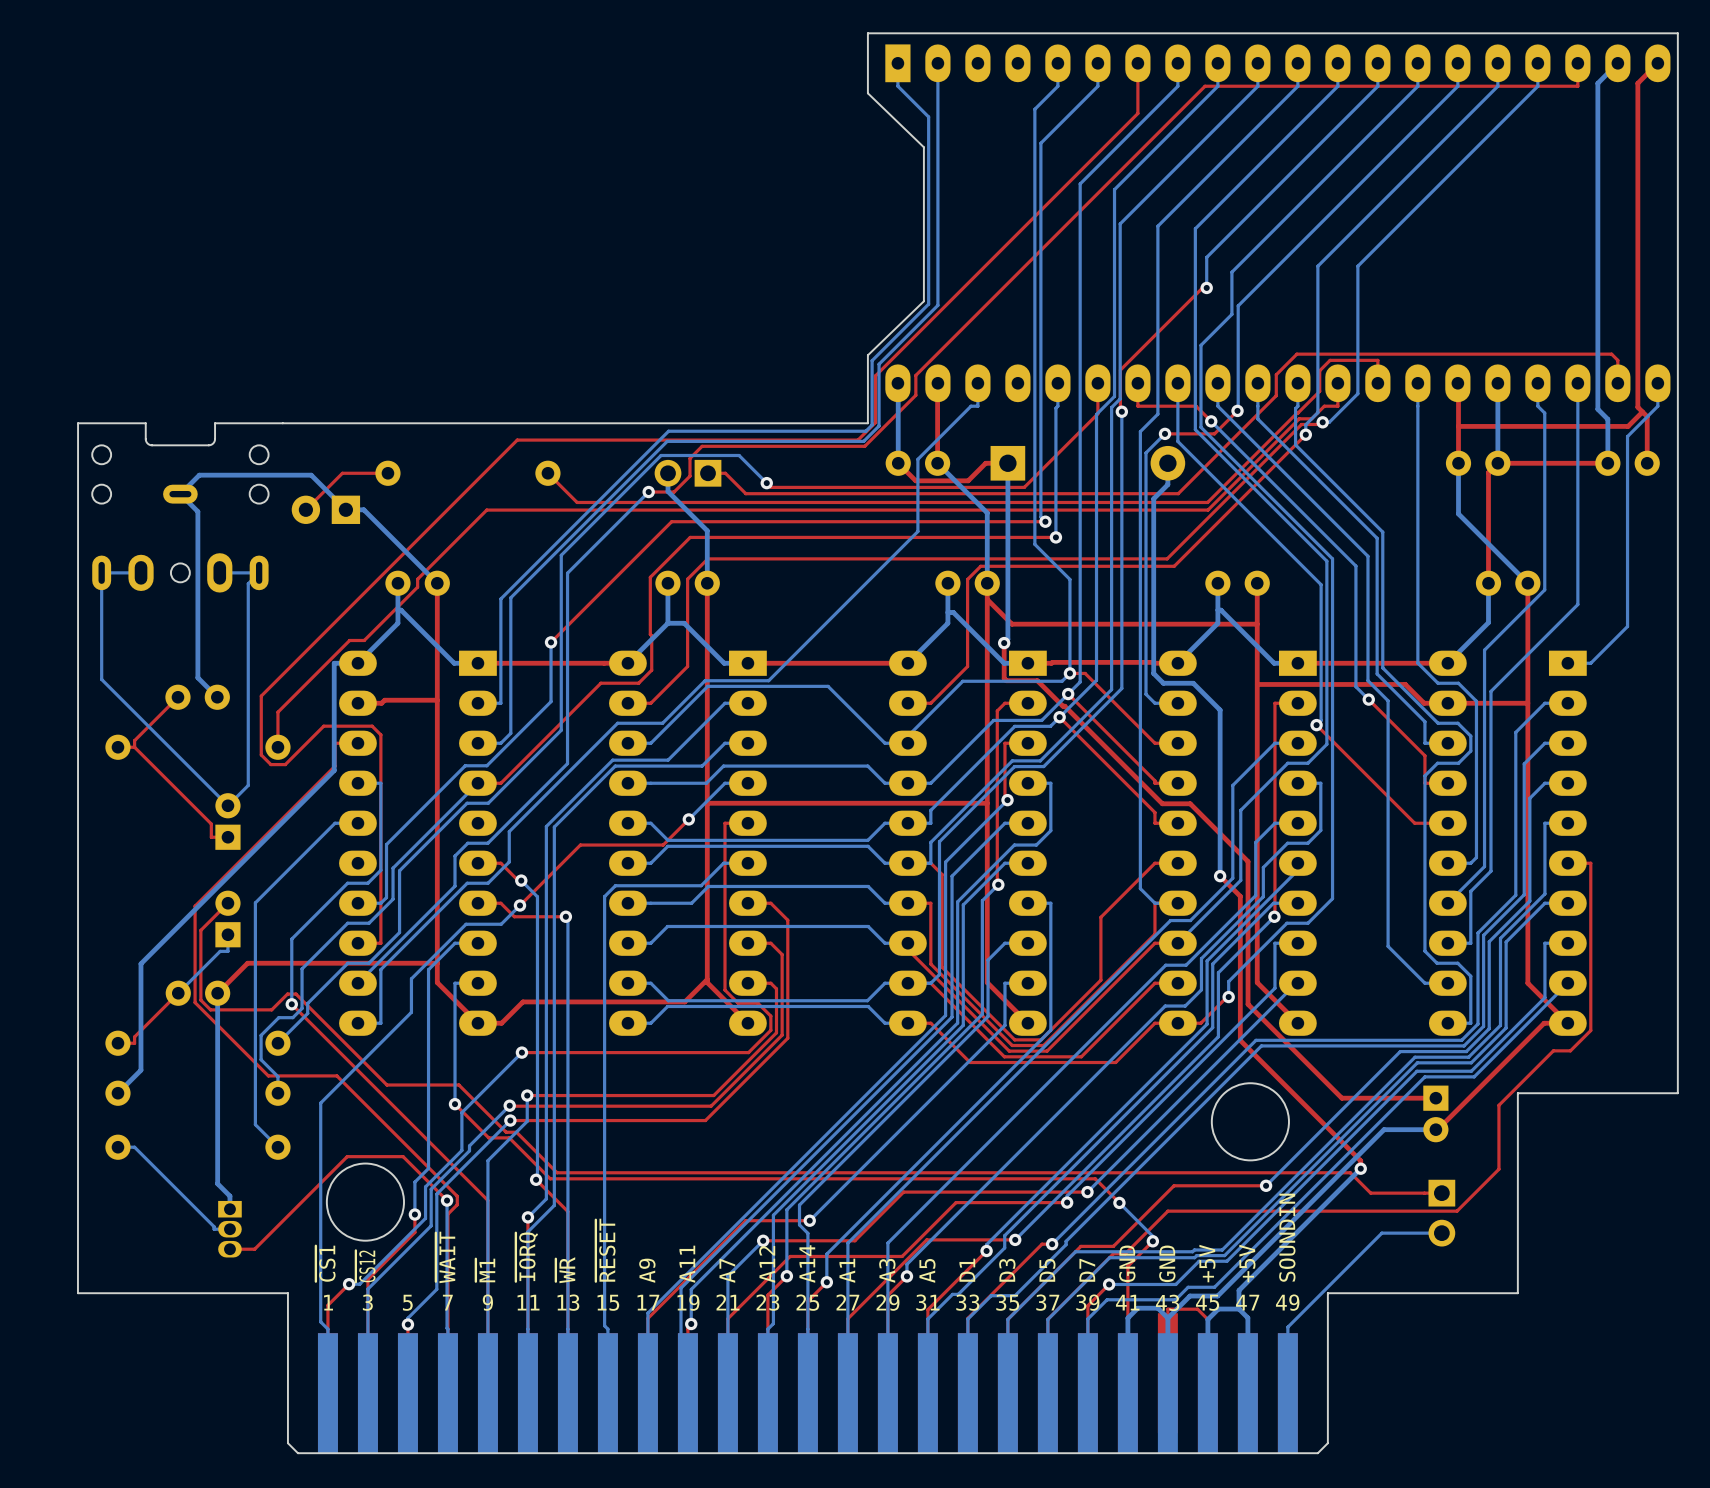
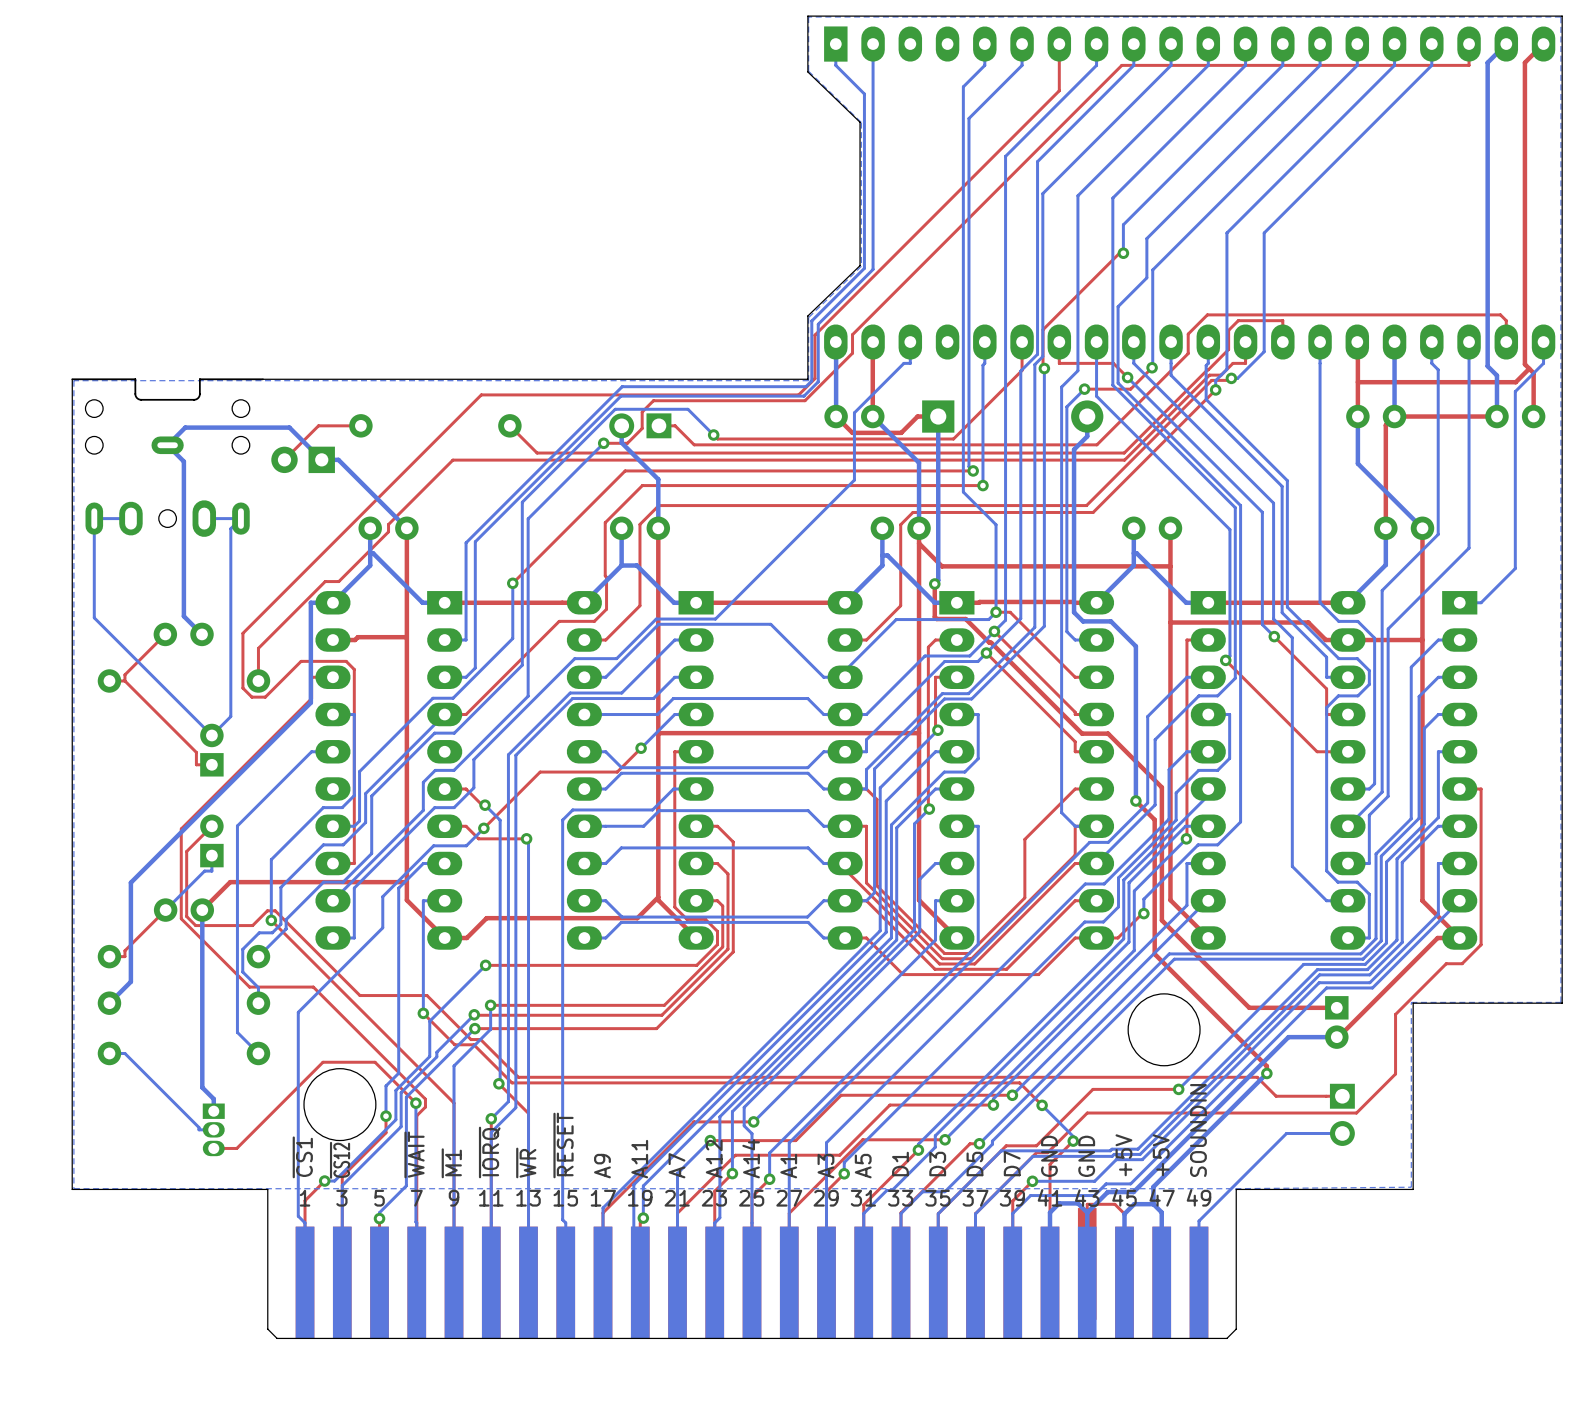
bottom zone outline: none -> (1560, 16) (808, 16) (808, 71) (861, 122) (861, 266) (808, 317) (808, 380) (73, 380) (73, 1188) (1411, 1187) (1411, 1002) (1560, 1002) (1560, 16)

